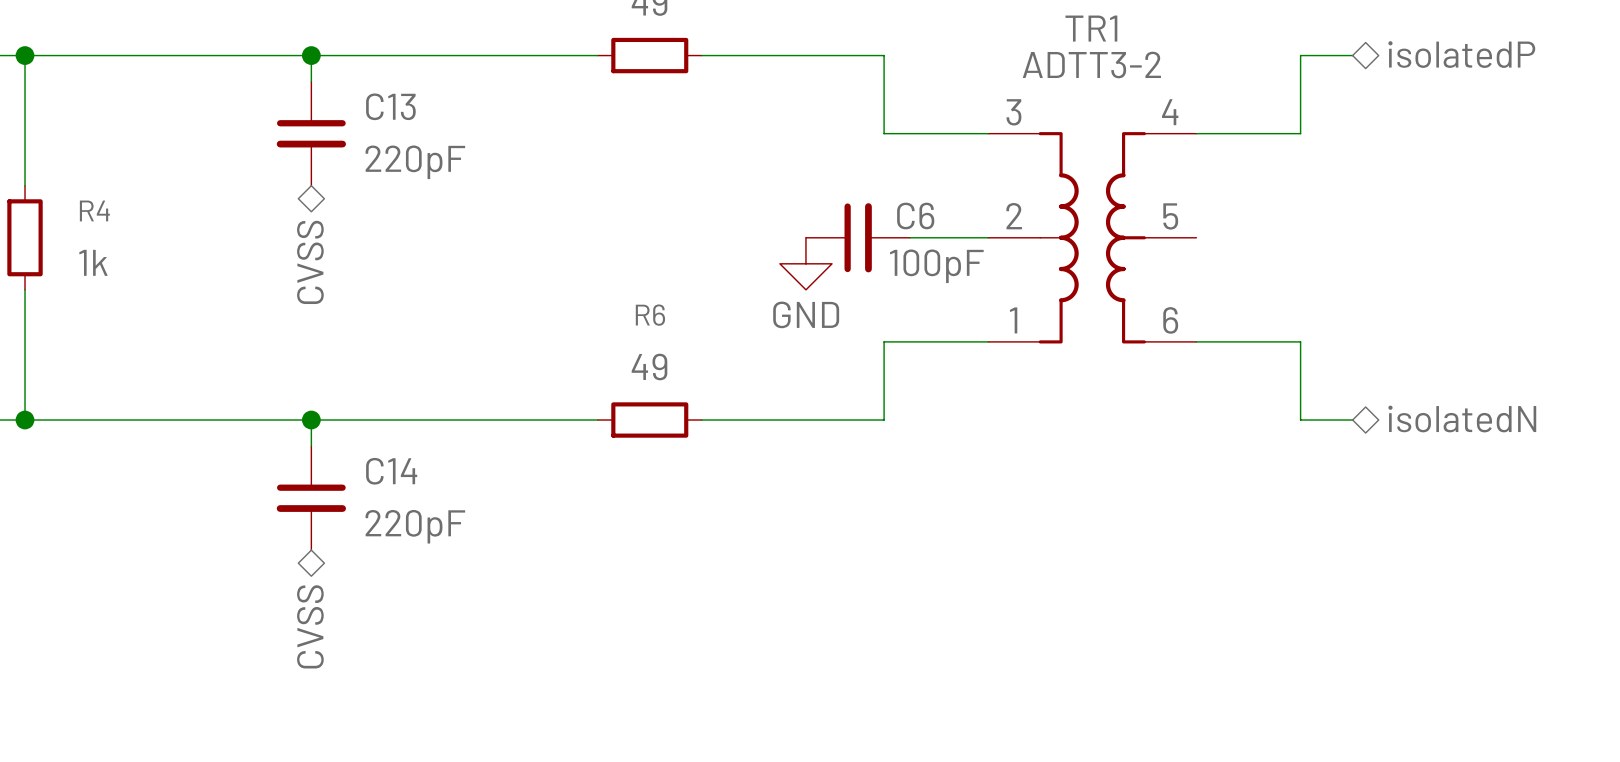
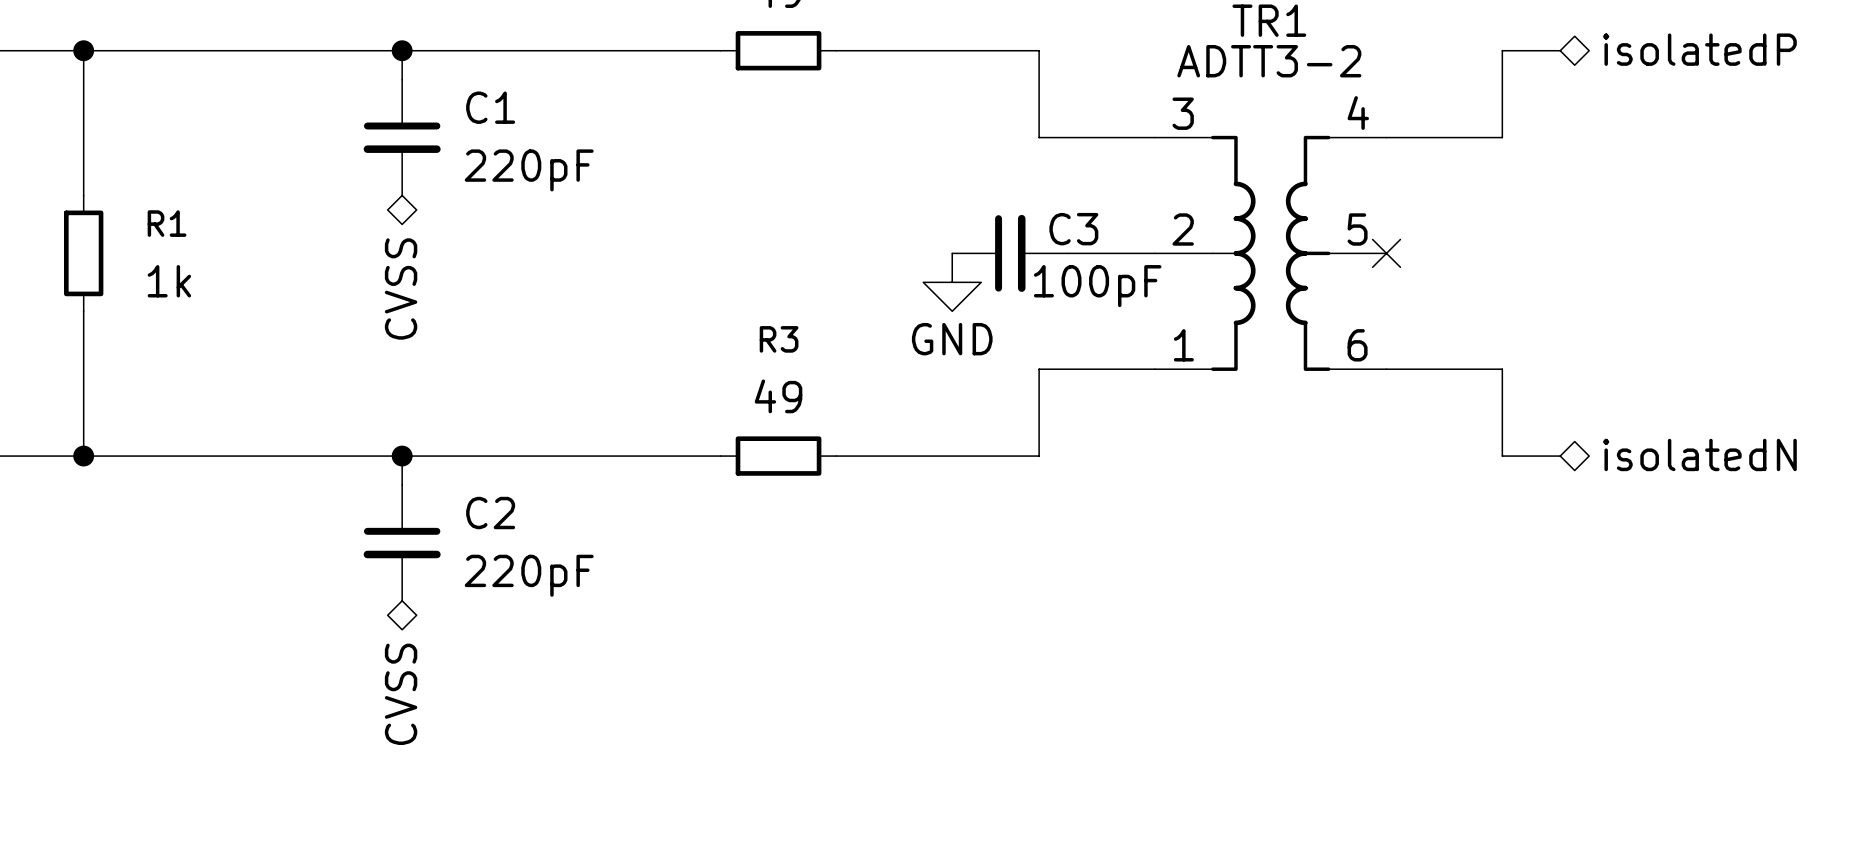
C13 name: C13 (390, 106) -> C1 (490, 107)
R4 name: R4 (94, 210) -> R1 (167, 223)
C6 name: C6 (915, 216) -> C3 (1073, 229)
no-connect mark: none -> (1386, 253)
R6 name: R6 (650, 315) -> R3 (779, 339)
C14 name: C14 (391, 471) -> C2 (490, 513)

